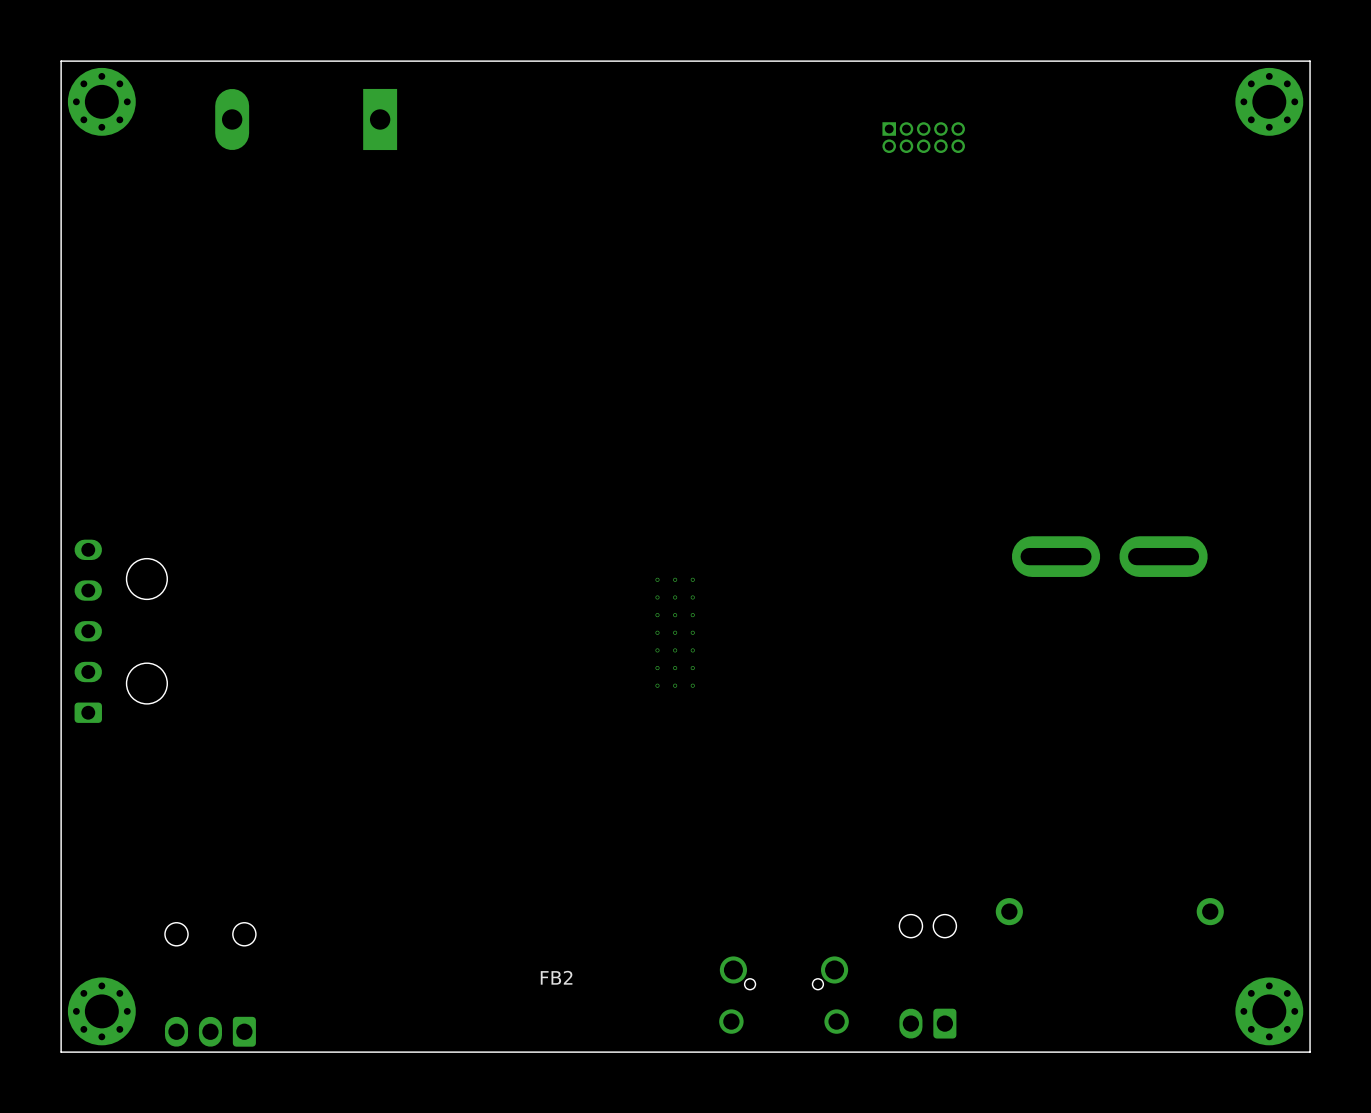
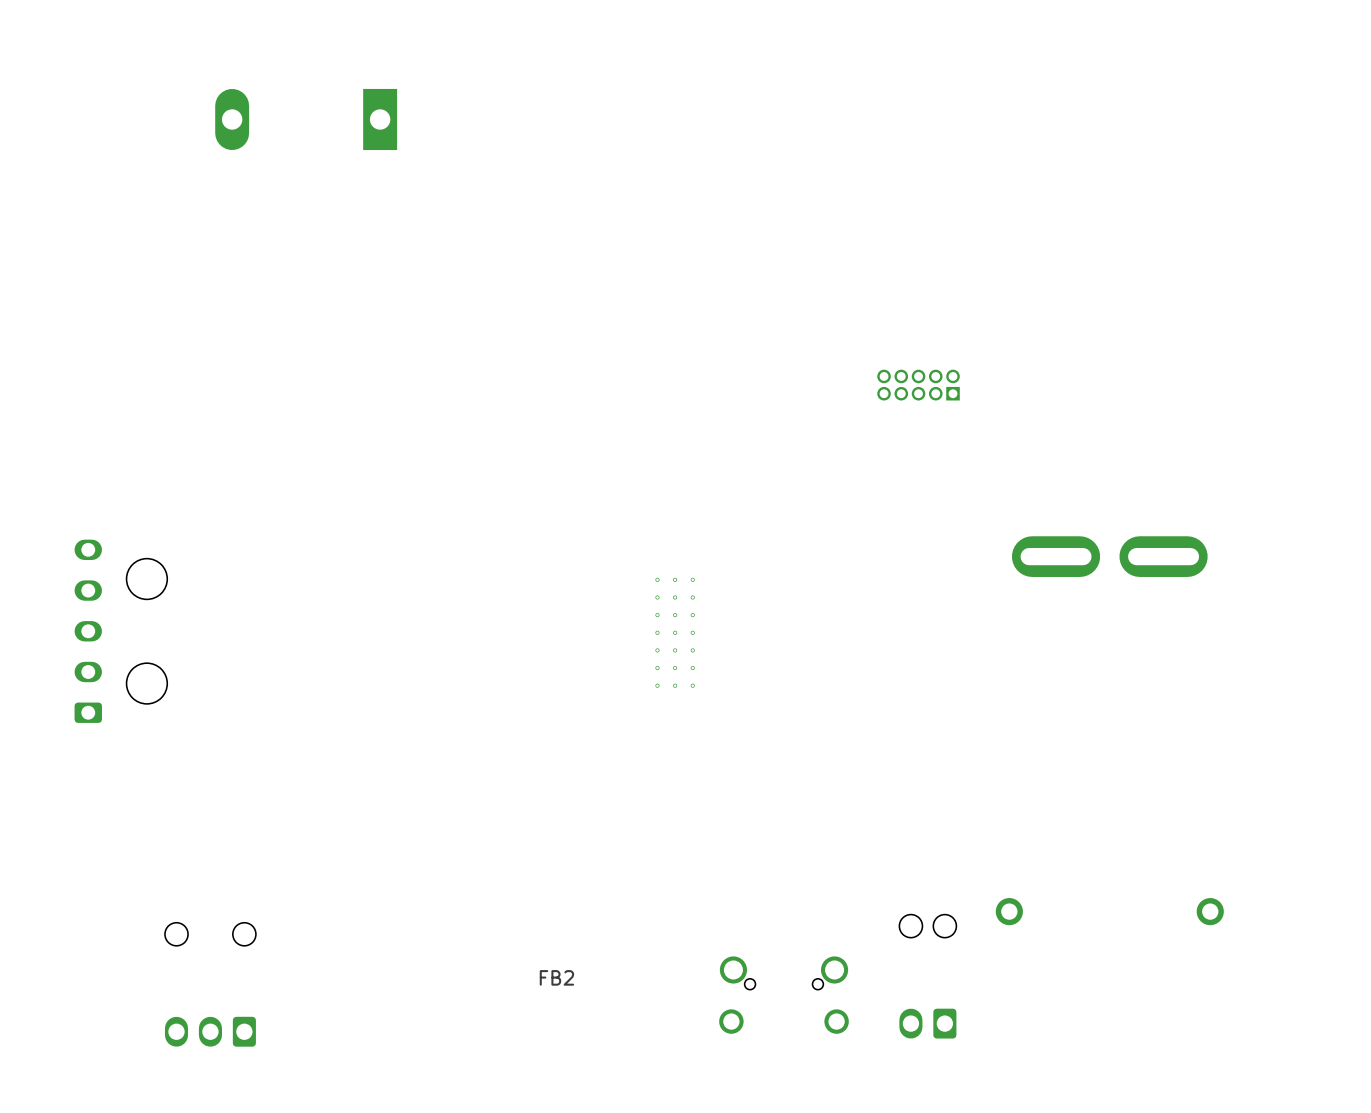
board edge: (1310, 61) (1310, 1052) (61, 1052) (61, 61) (1310, 61) -> none
part: (101, 101) -> none
part: (1269, 101) -> none
part rotation: 0° (923, 137) -> 180° (918, 385)
part position: (923, 137) -> (918, 385)
part: (101, 1011) -> none
part: (1269, 1011) -> none

